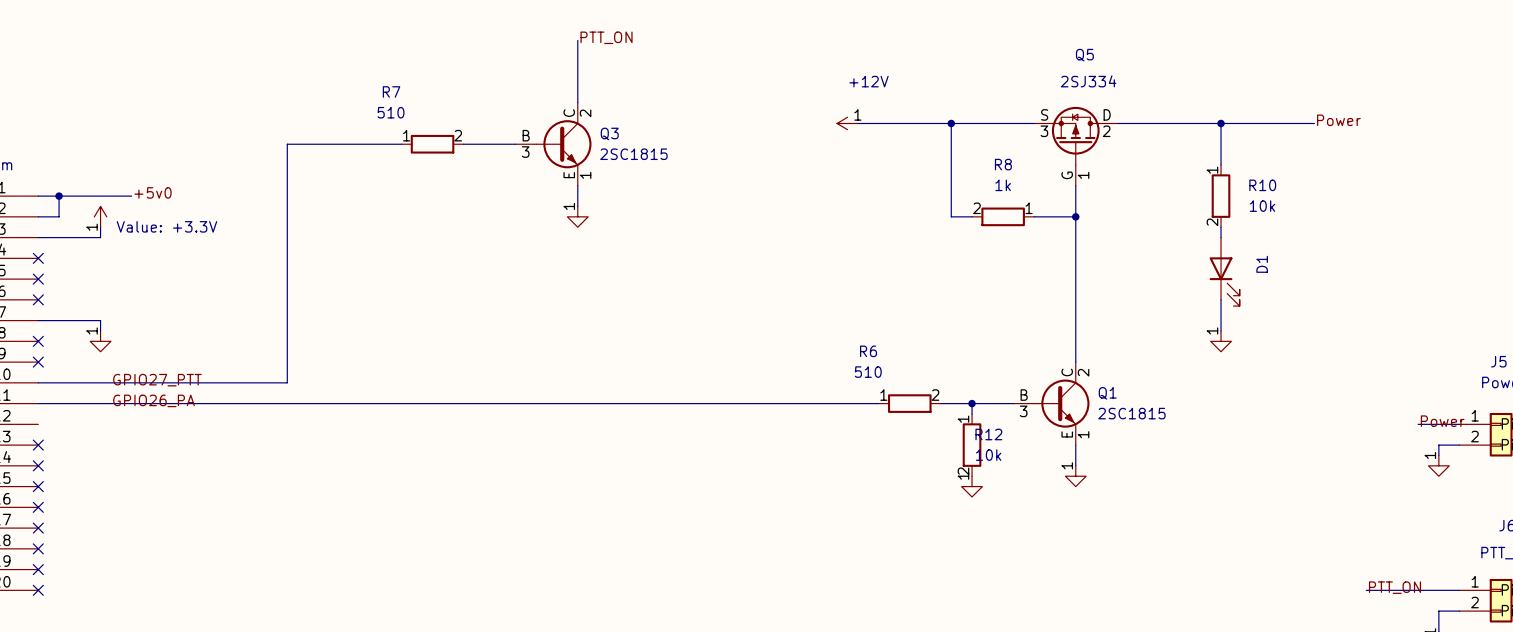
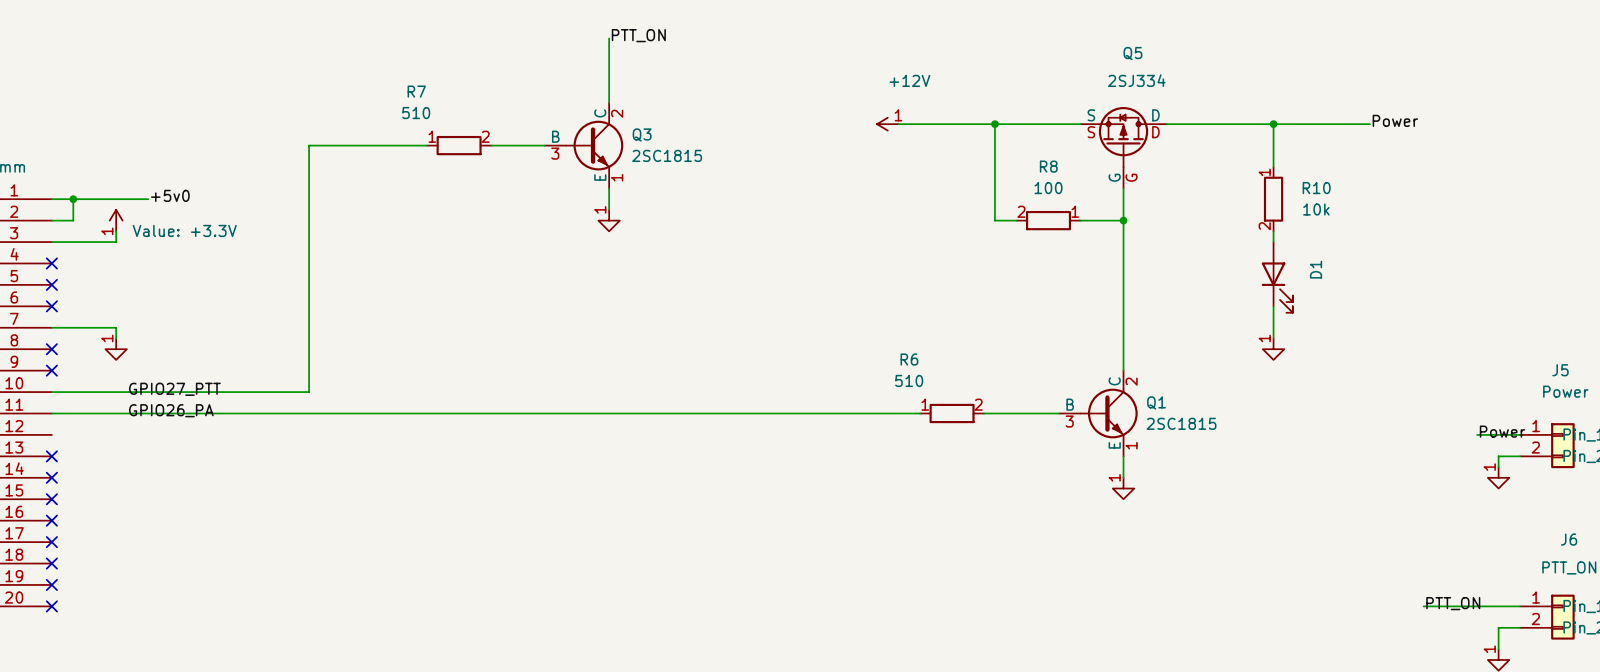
Q5 pin number: 3 (1044, 131) -> S (1091, 132)
Q5 pin number: 2 (1106, 131) -> D (1155, 132)
Q5 pin number: 1 (1083, 175) -> G (1131, 177)
R8 value: 1k (1003, 185) -> 100 (1048, 188)
wire: (972, 403) (972, 413) -> none
junction: (972, 403) -> none
R12: 10k (972, 445) -> none
power symbol: (972, 486) -> none

